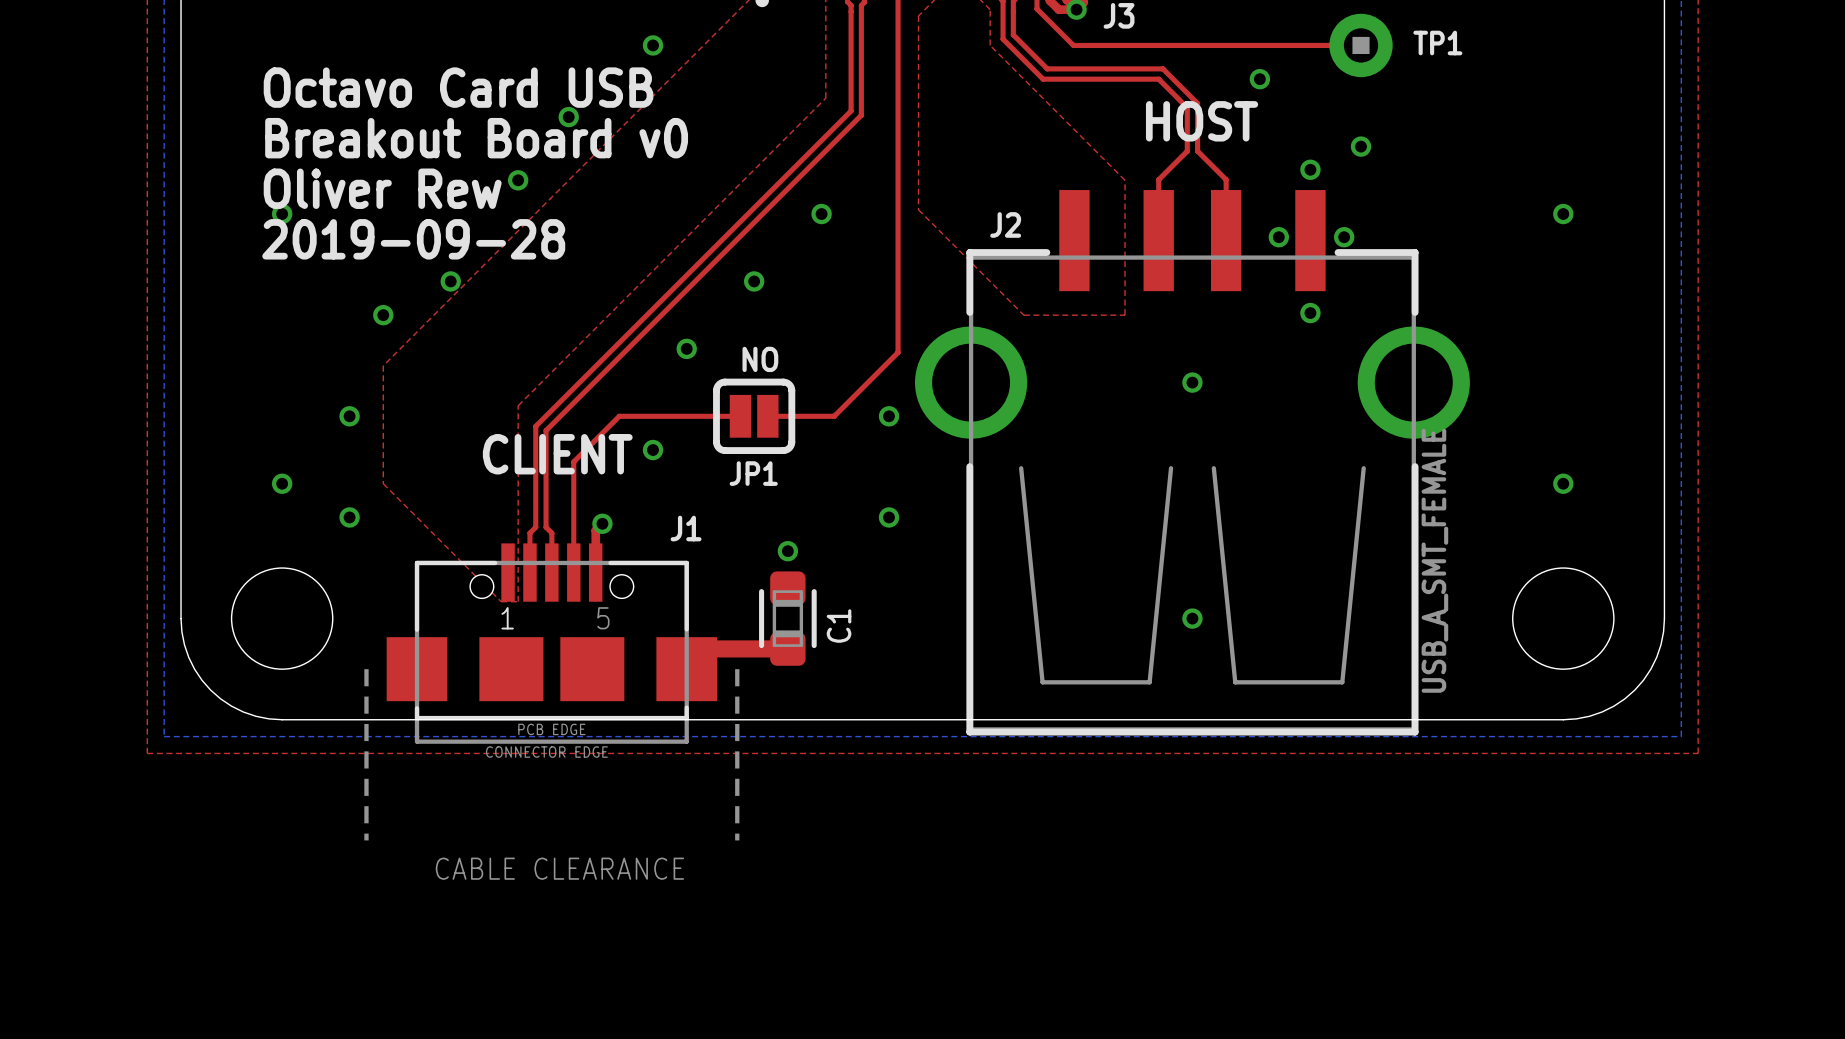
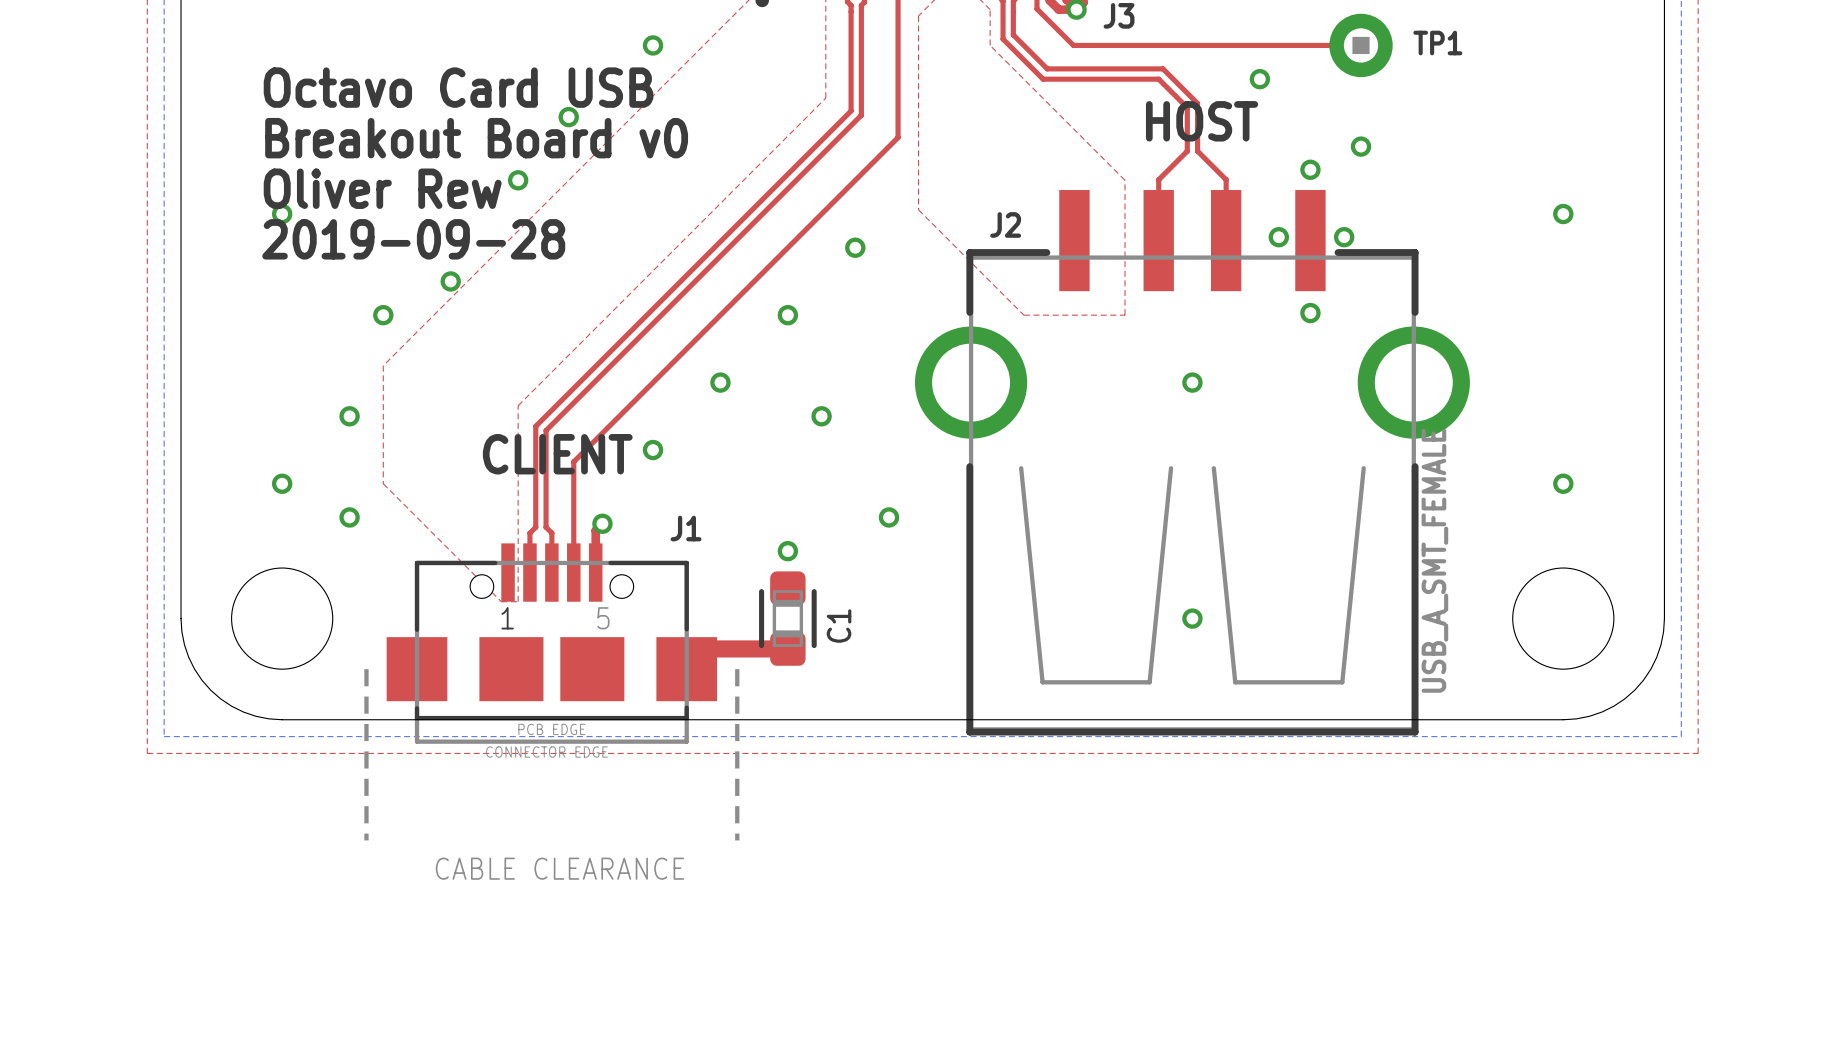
top track: (898, 137) (898, 352) (834, 416) (767, 416) -> (898, 137) (619, 416)
via position: (821, 214) -> (855, 247)
via position: (754, 281) -> (787, 315)
via position: (686, 348) -> (720, 382)
text: NO (760, 359) -> none
top track: (619, 416) (740, 416) -> none
JP1: (754, 416) -> none
via position: (889, 416) -> (821, 416)

